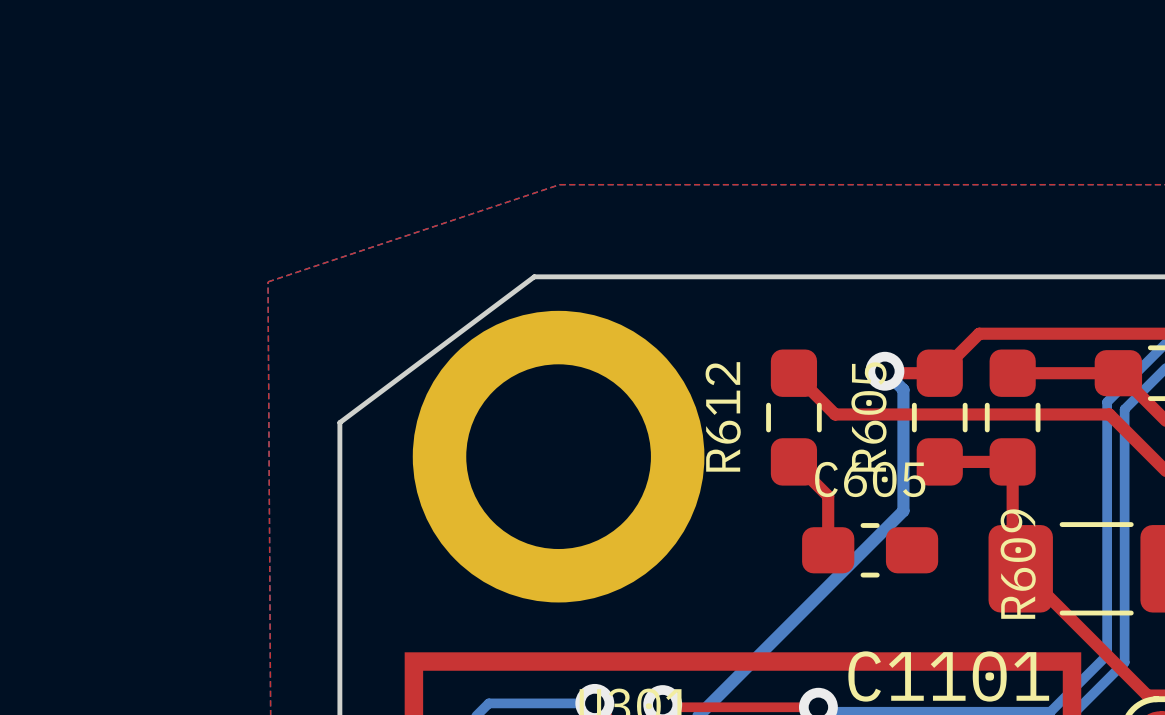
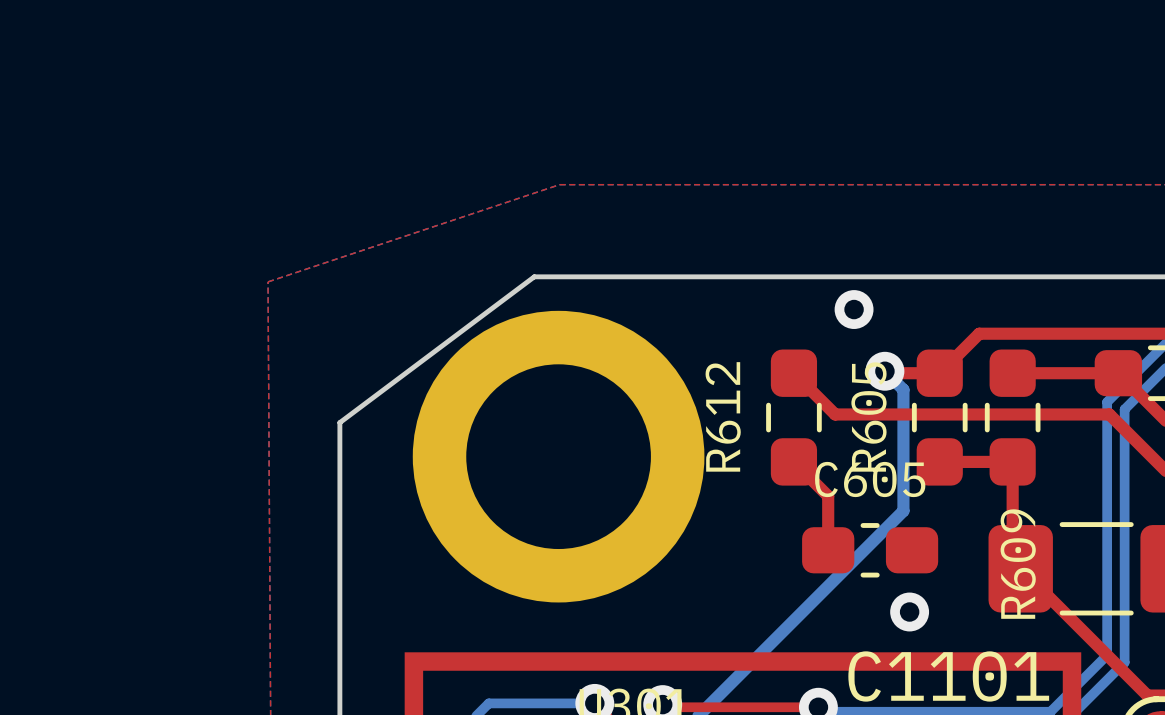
via: none -> (854, 309)
via: none -> (909, 612)

